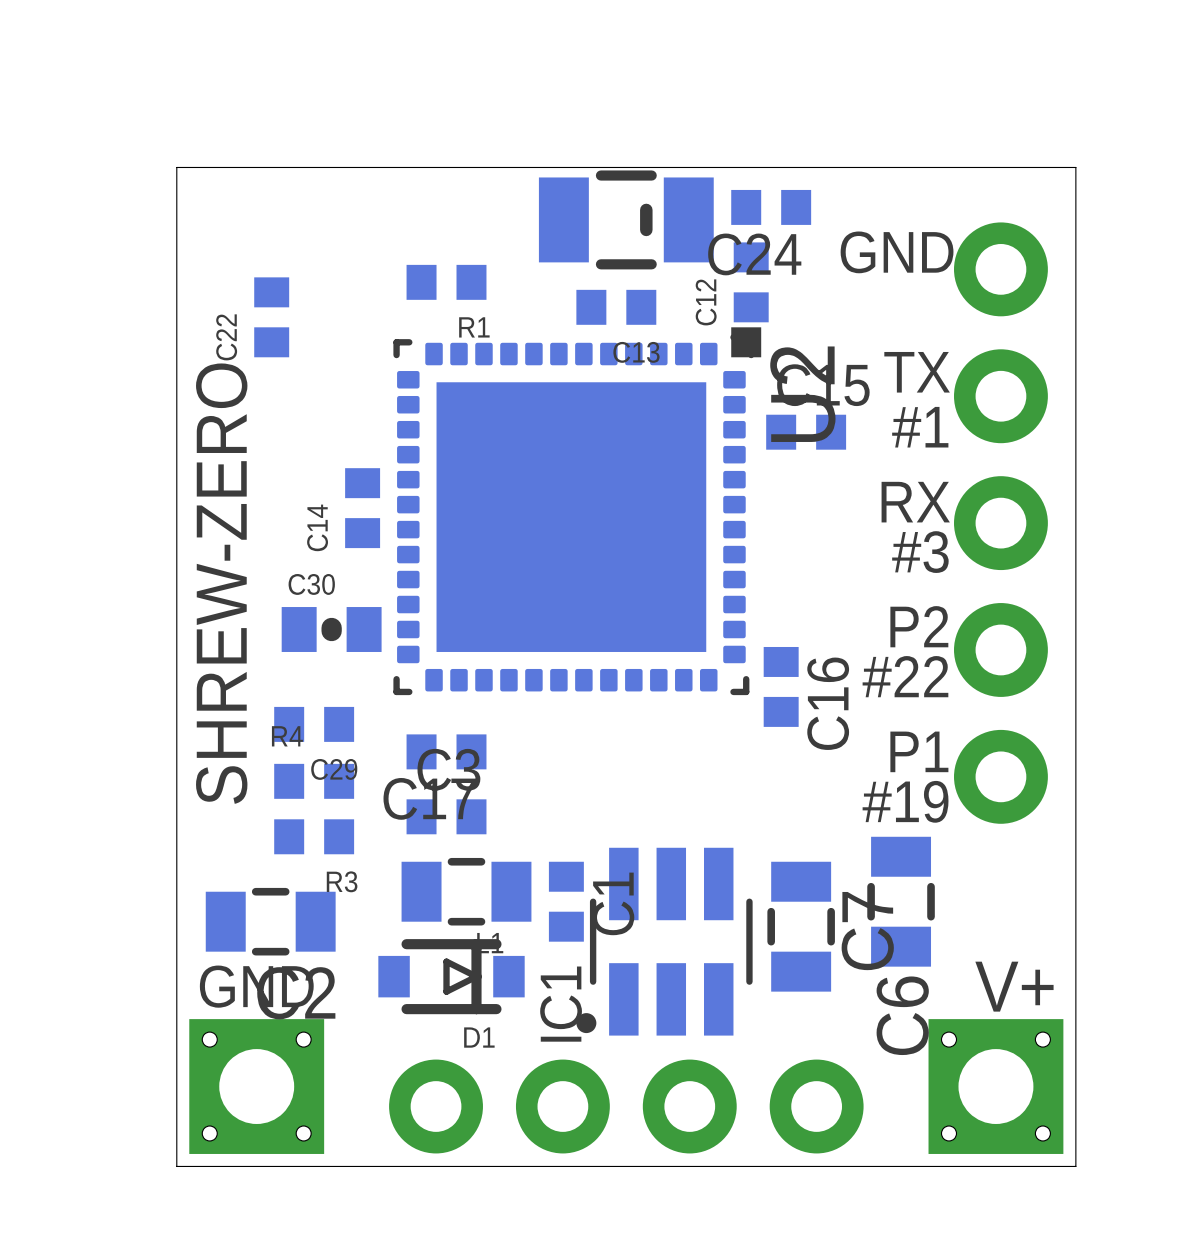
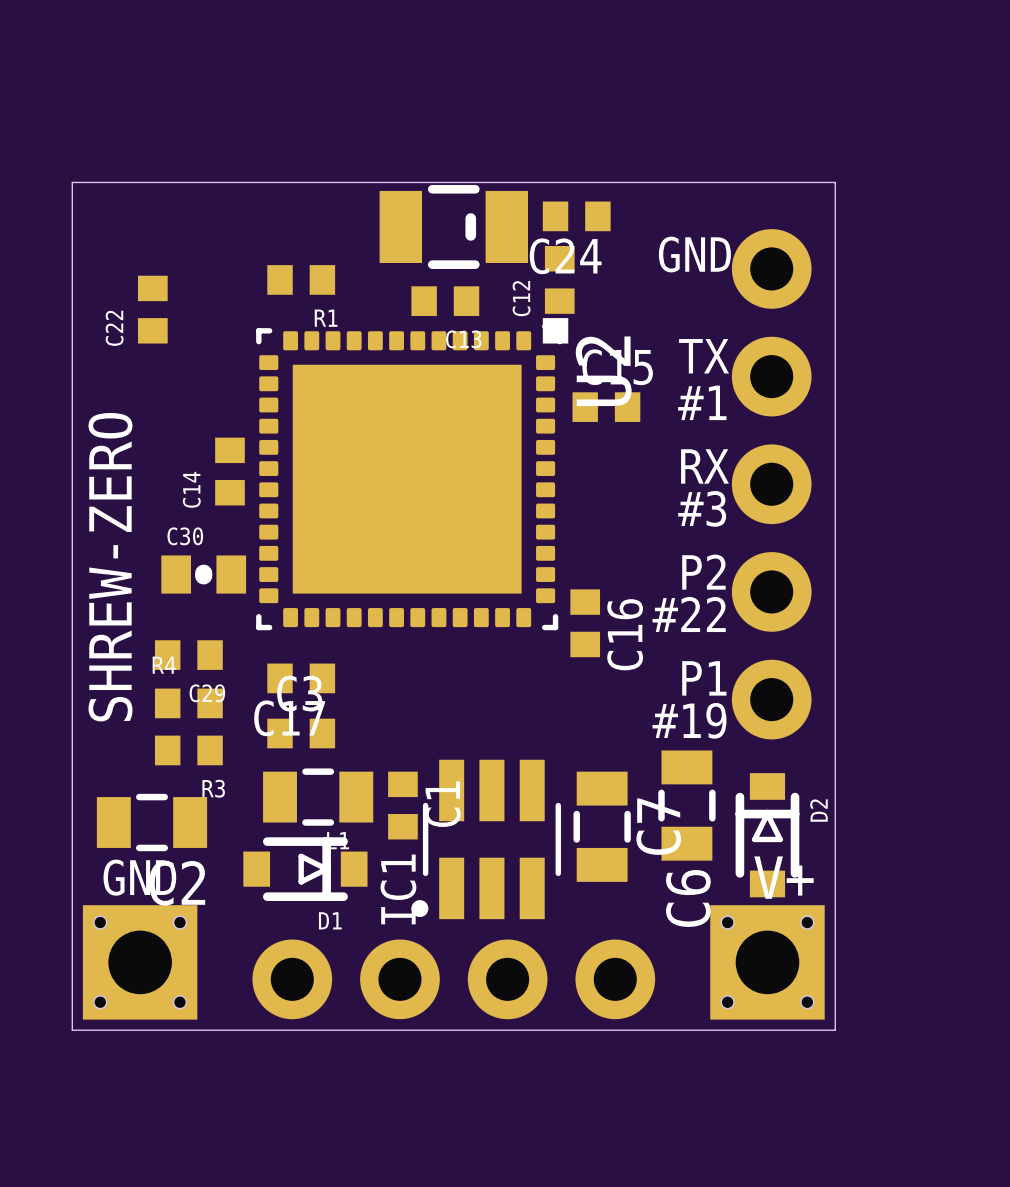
D2: none -> (767, 835)

